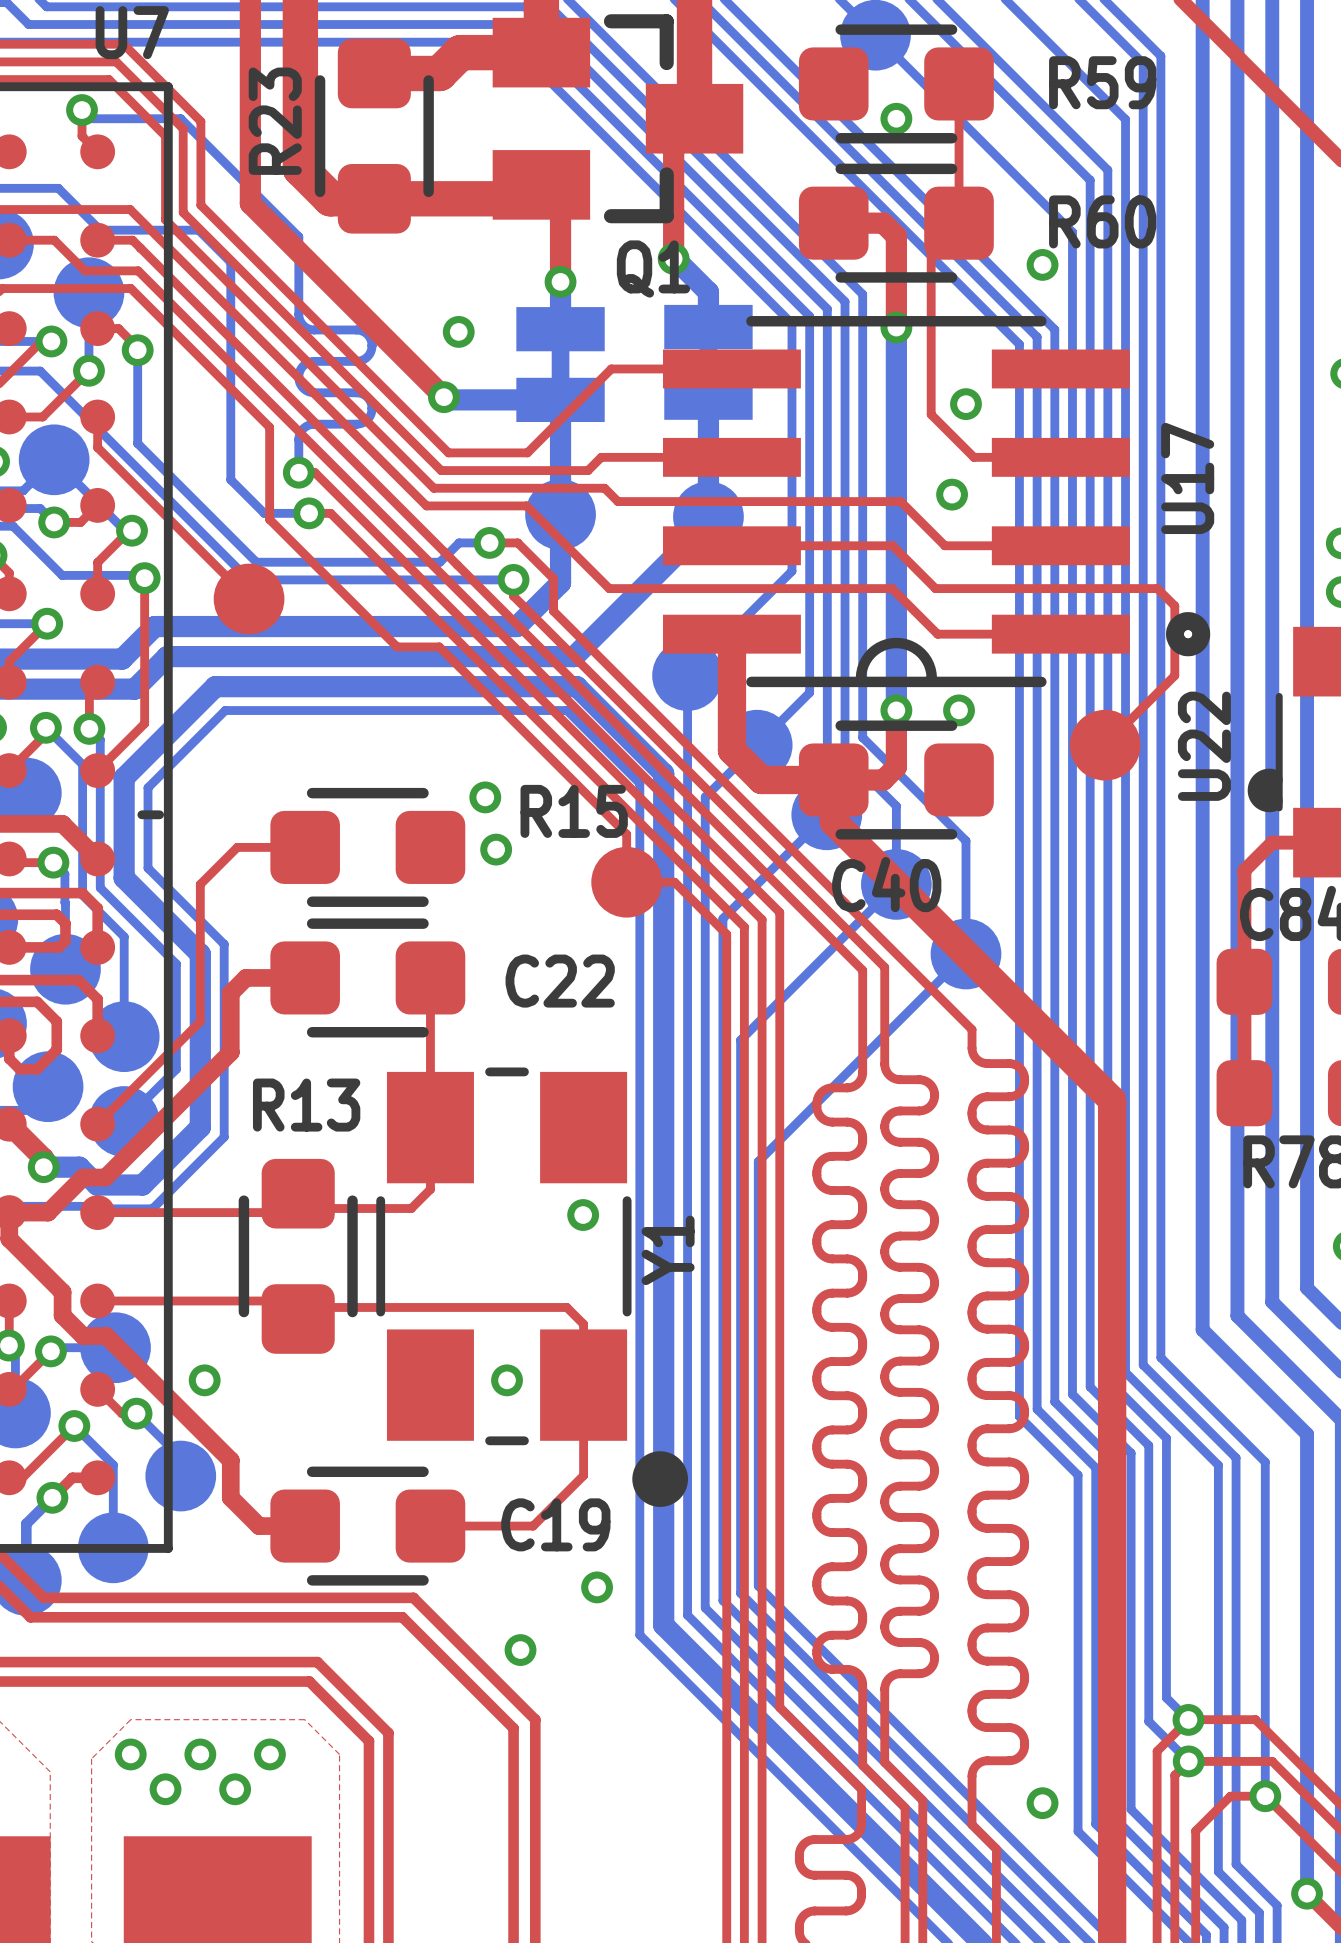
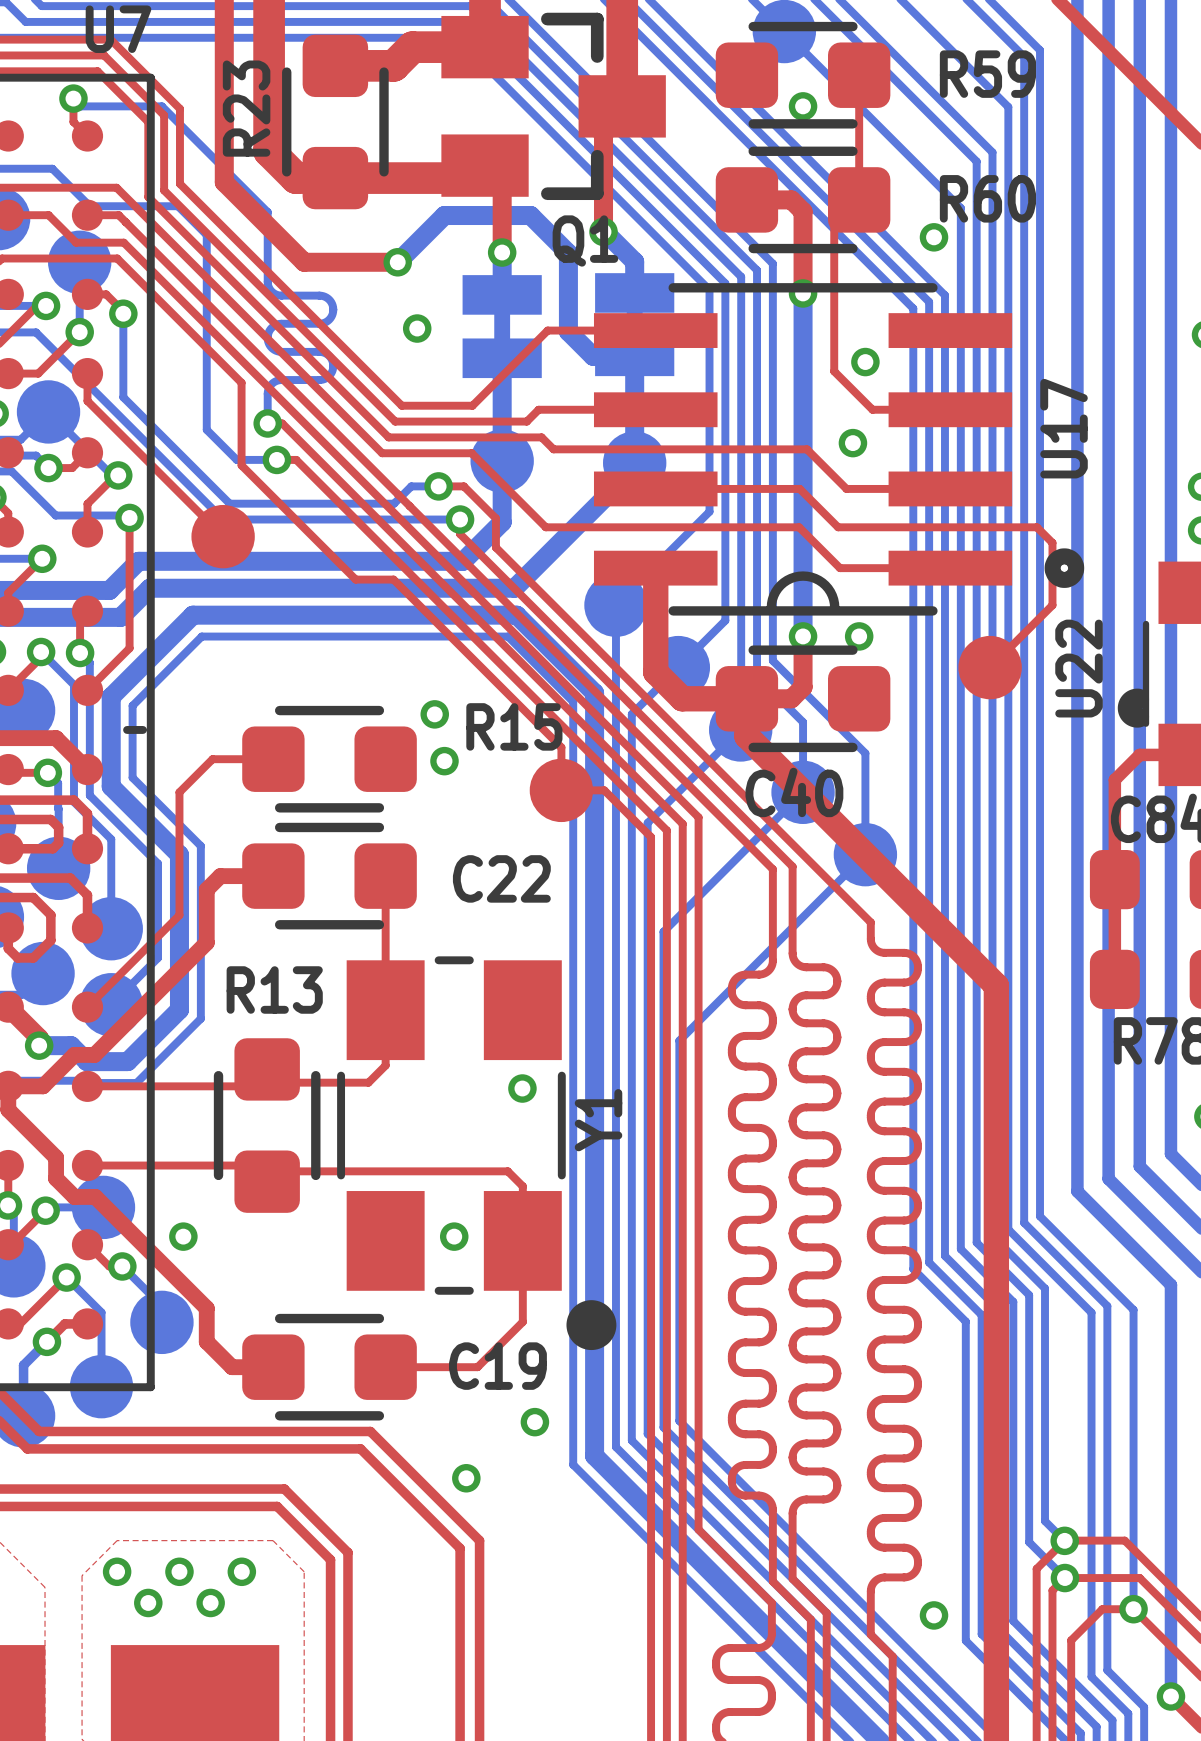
top track: (339, 292) (443, 397) -> (304, 262) (397, 262)
bottom track: none -> (397, 262) (444, 215) (530, 215) (568, 253) (568, 331) (593, 356) (634, 356)
via: none -> (397, 262)
via: (458, 331) -> none
bottom track: (443, 397) (446, 399) (560, 399) -> none
via position: (443, 397) -> (417, 328)

